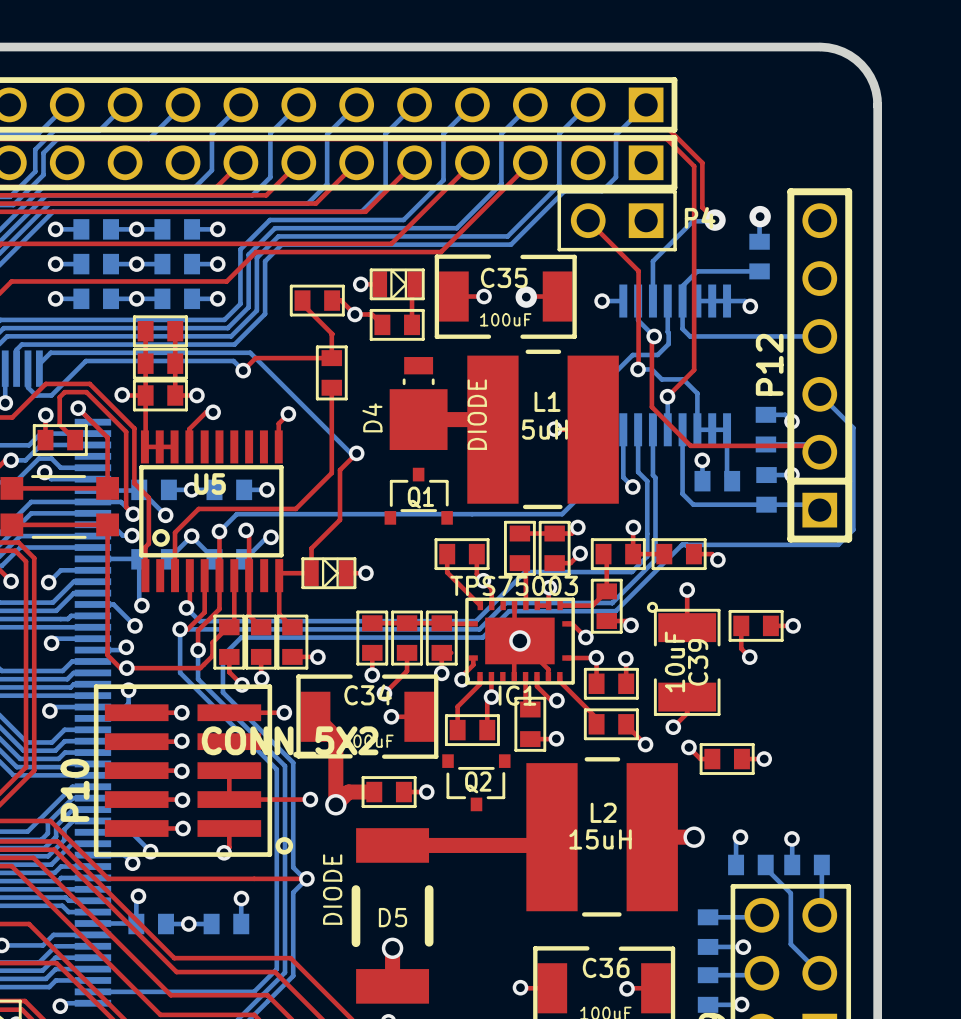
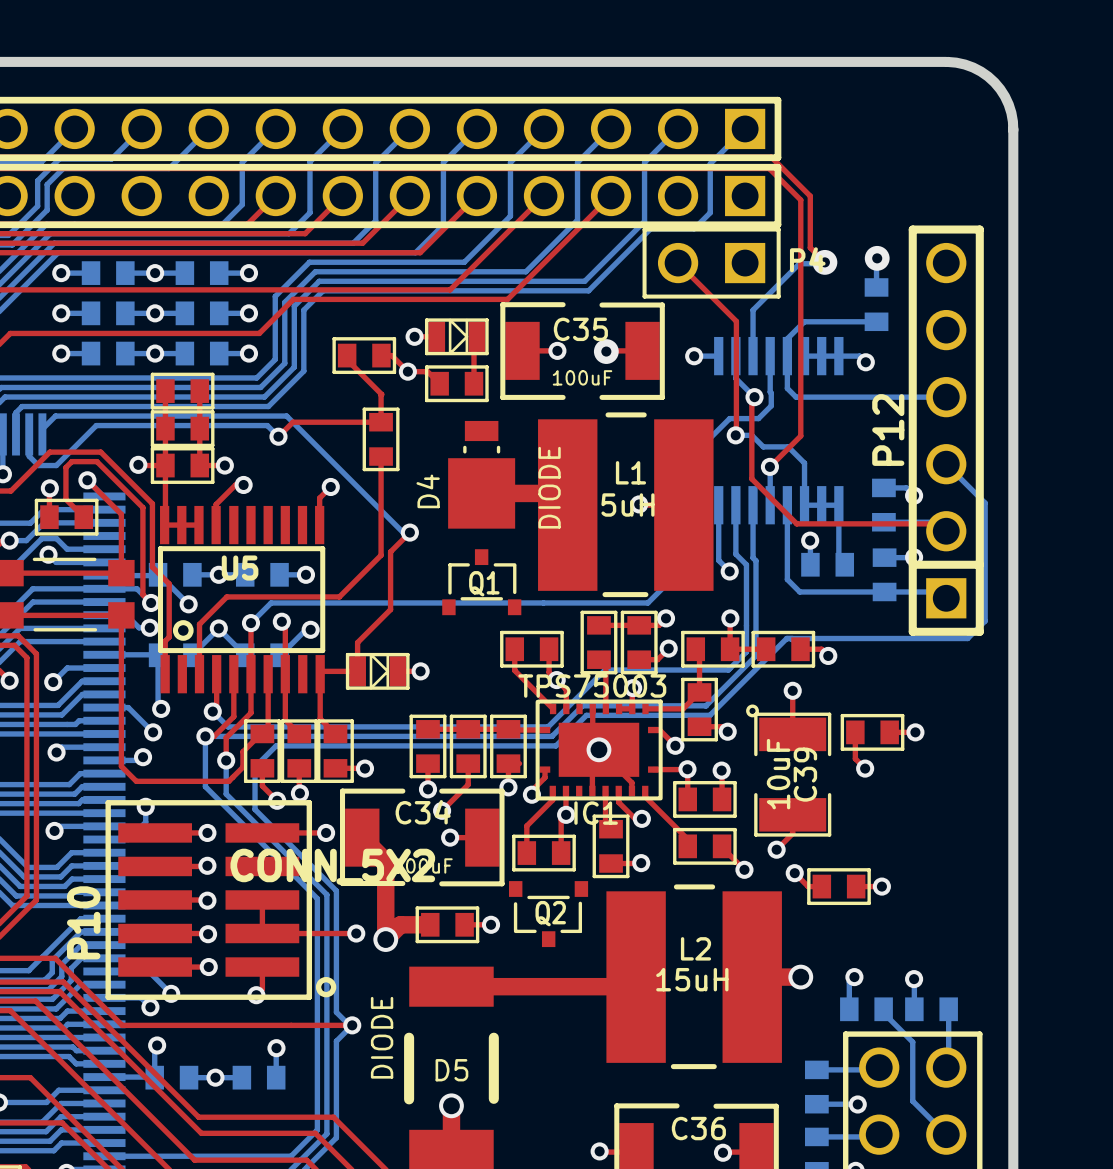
via: (126, 668) -> none

